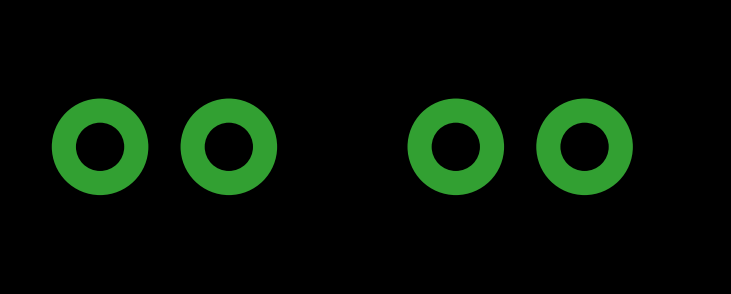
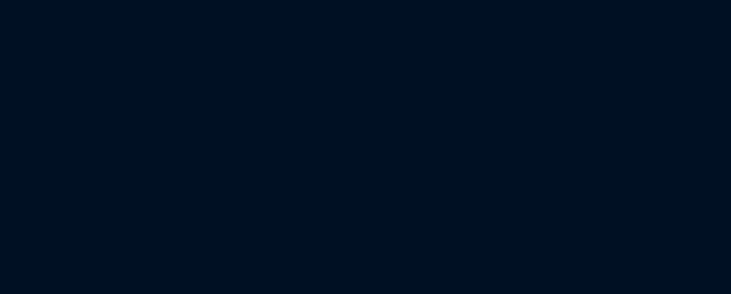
part: (164, 146) -> none
part: (520, 146) -> none

